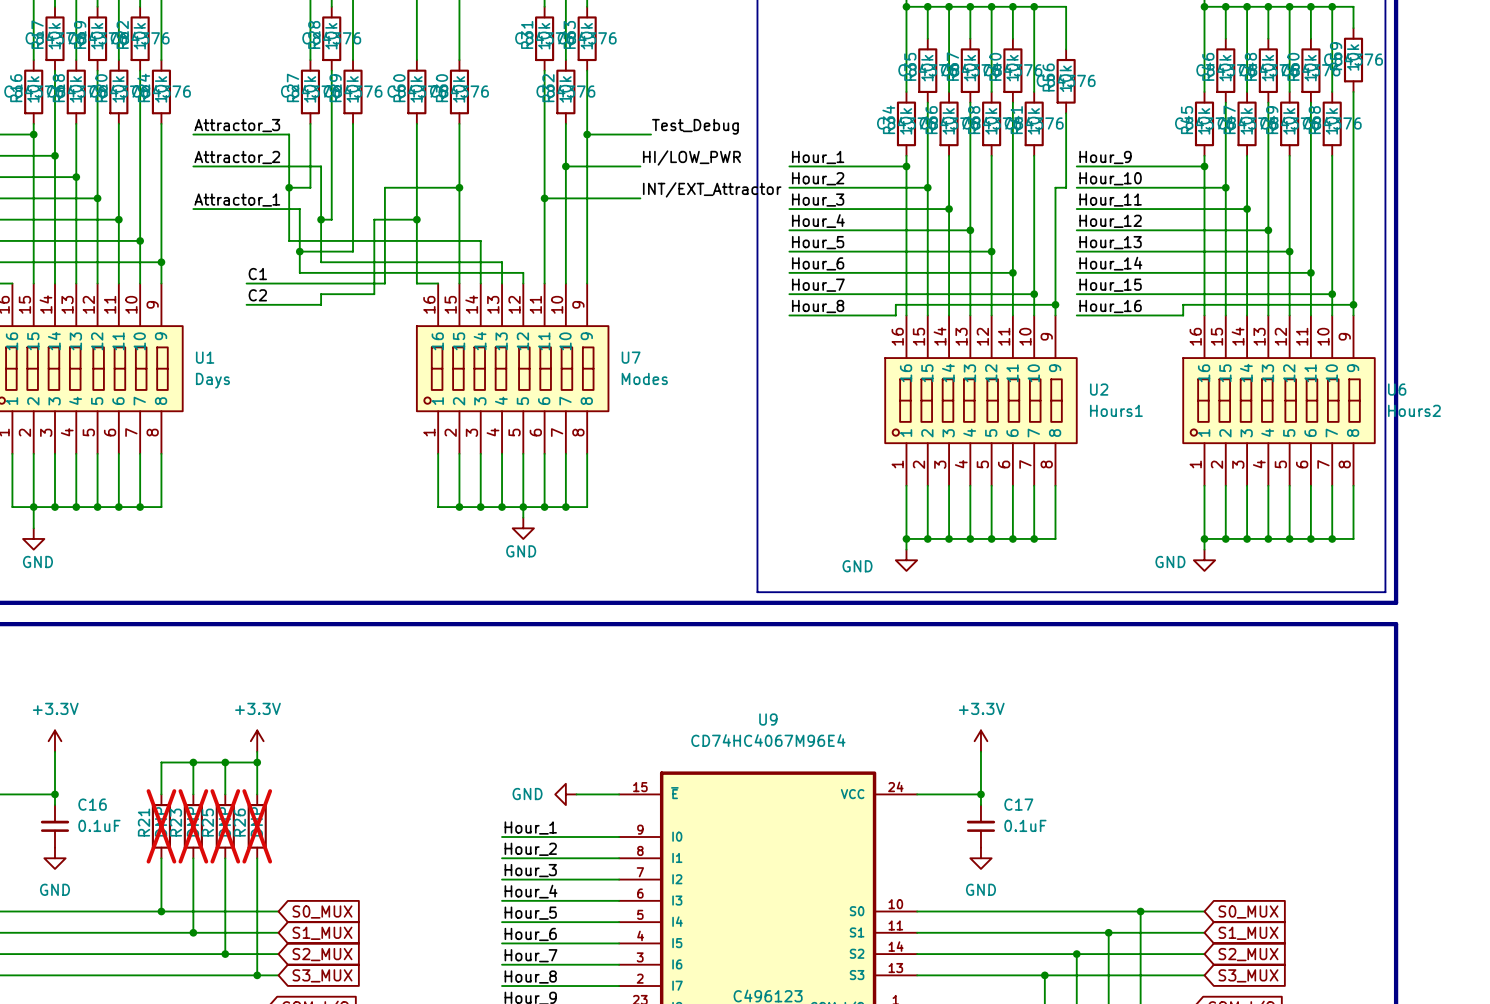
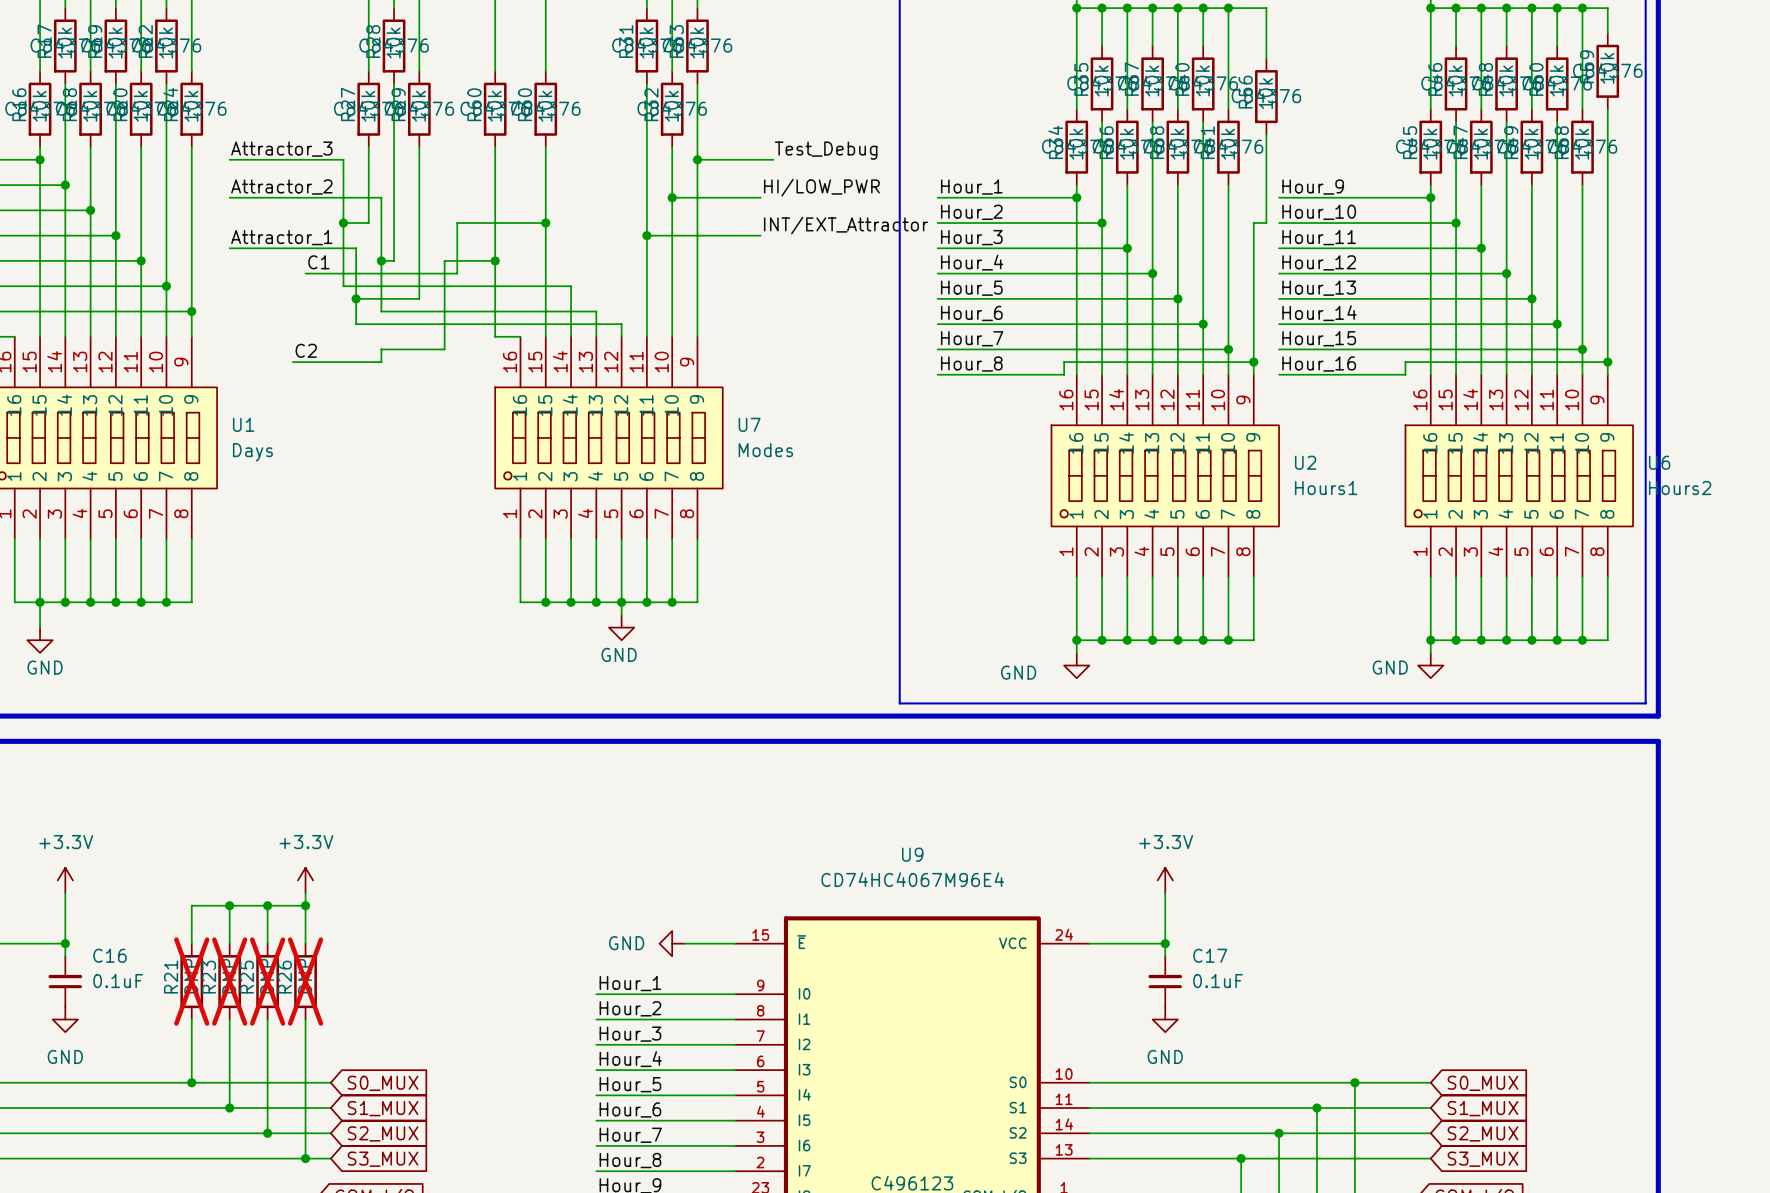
wire: (384, 230) (384, 283) (246, 283) -> (457, 273) (305, 273)
label position: C1 (257, 274) -> C1 (318, 262)

